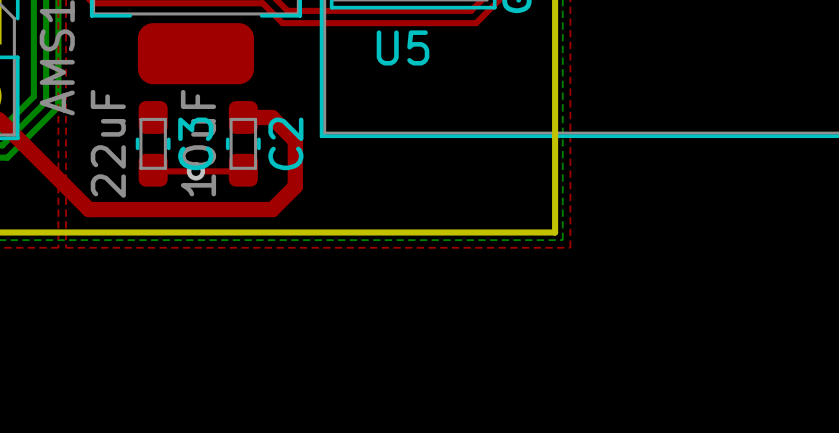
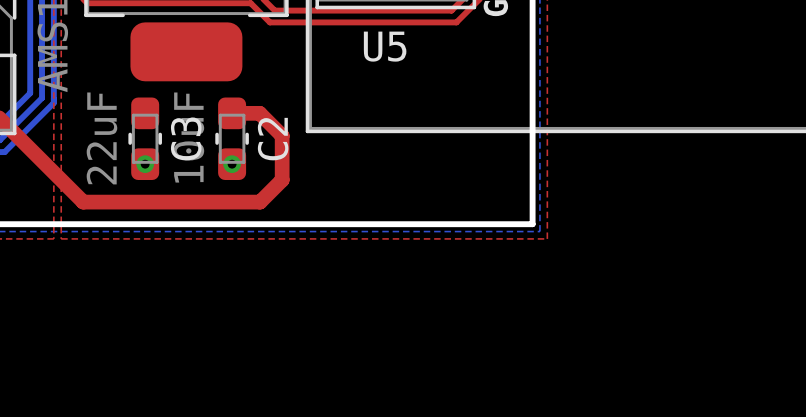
top track: (153, 170) (243, 170) -> none
via: none -> (145, 164)
via: none -> (232, 164)
via: (195, 171) -> none

